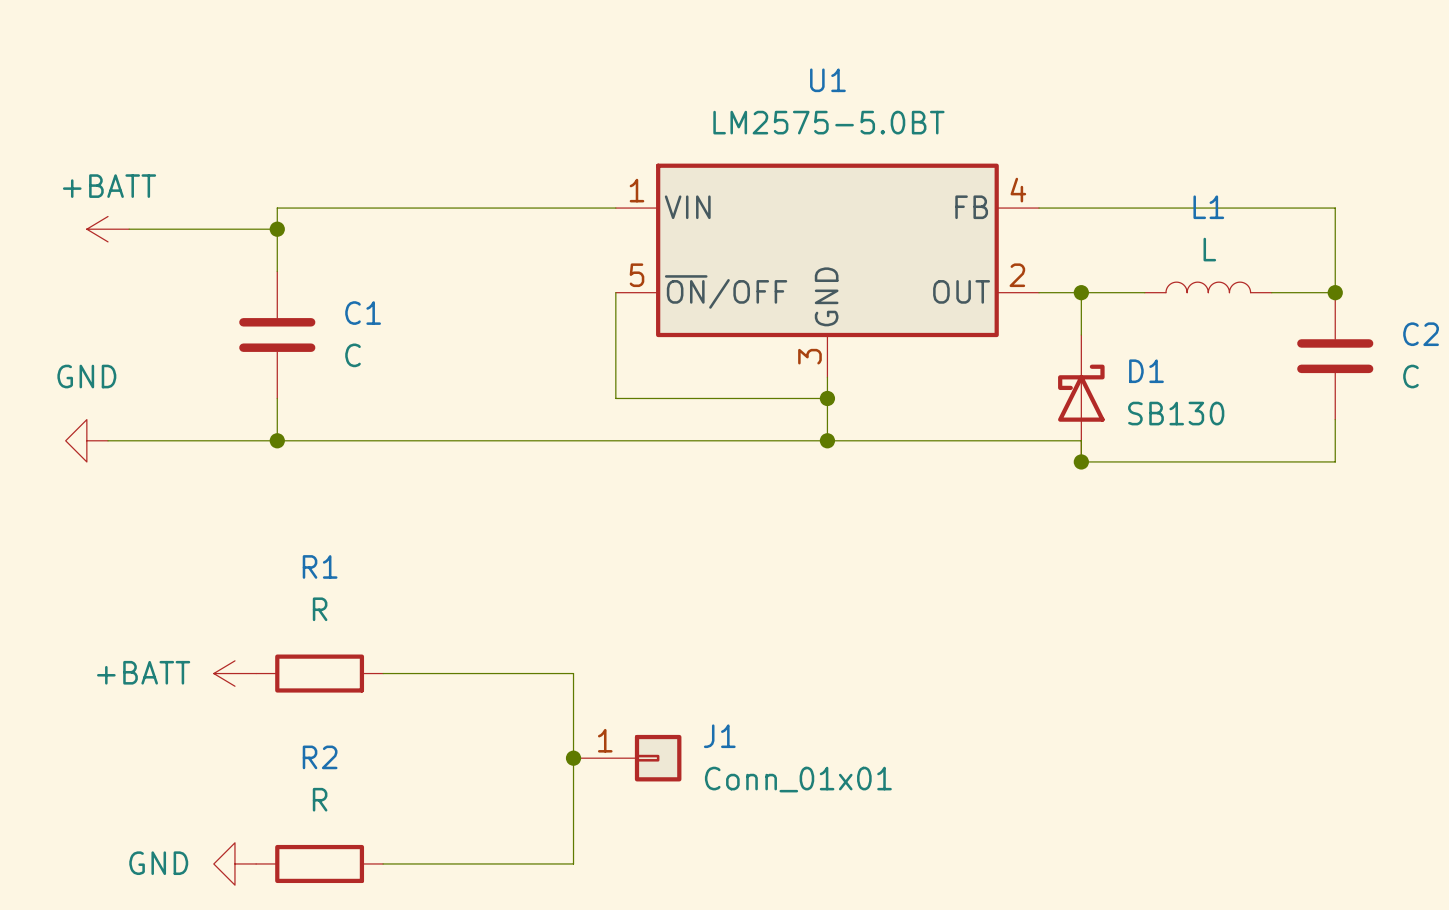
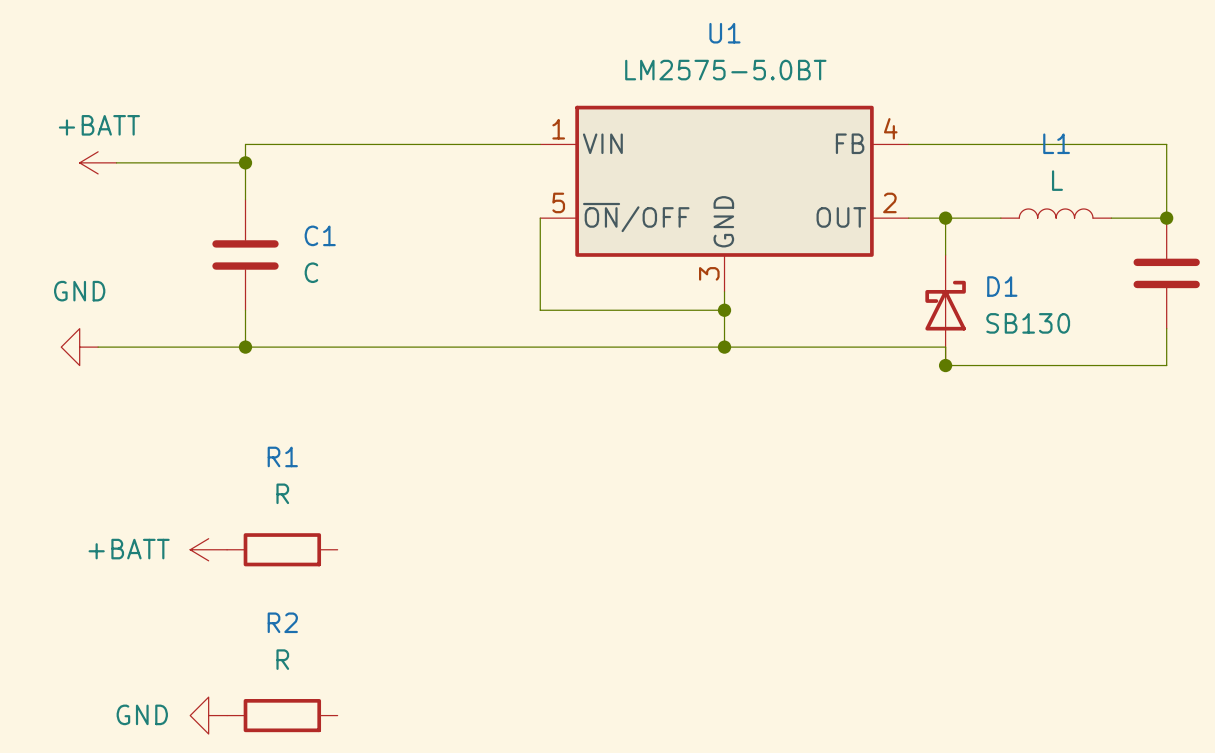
wire: (383, 673) (573, 673) (573, 863) (383, 863) -> none
junction: (573, 758) -> none
J1: Conn_01x01 (627, 758) -> none

